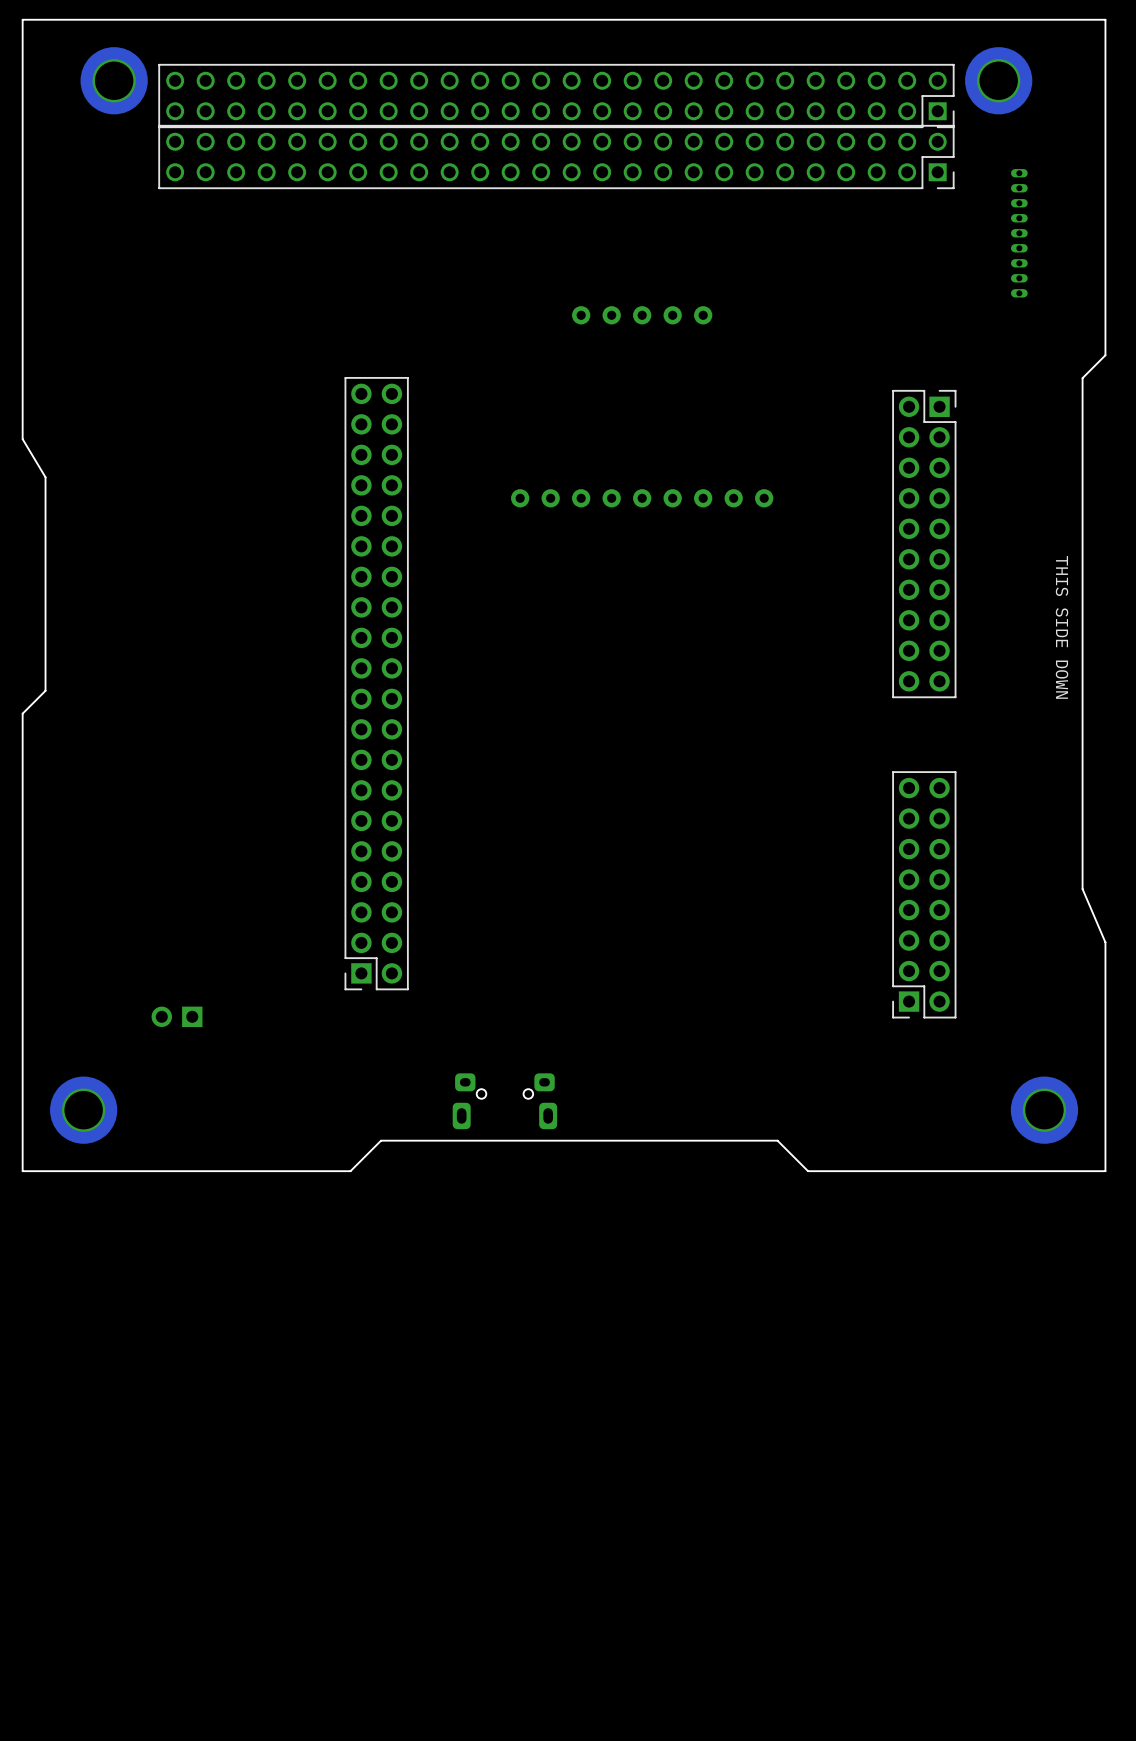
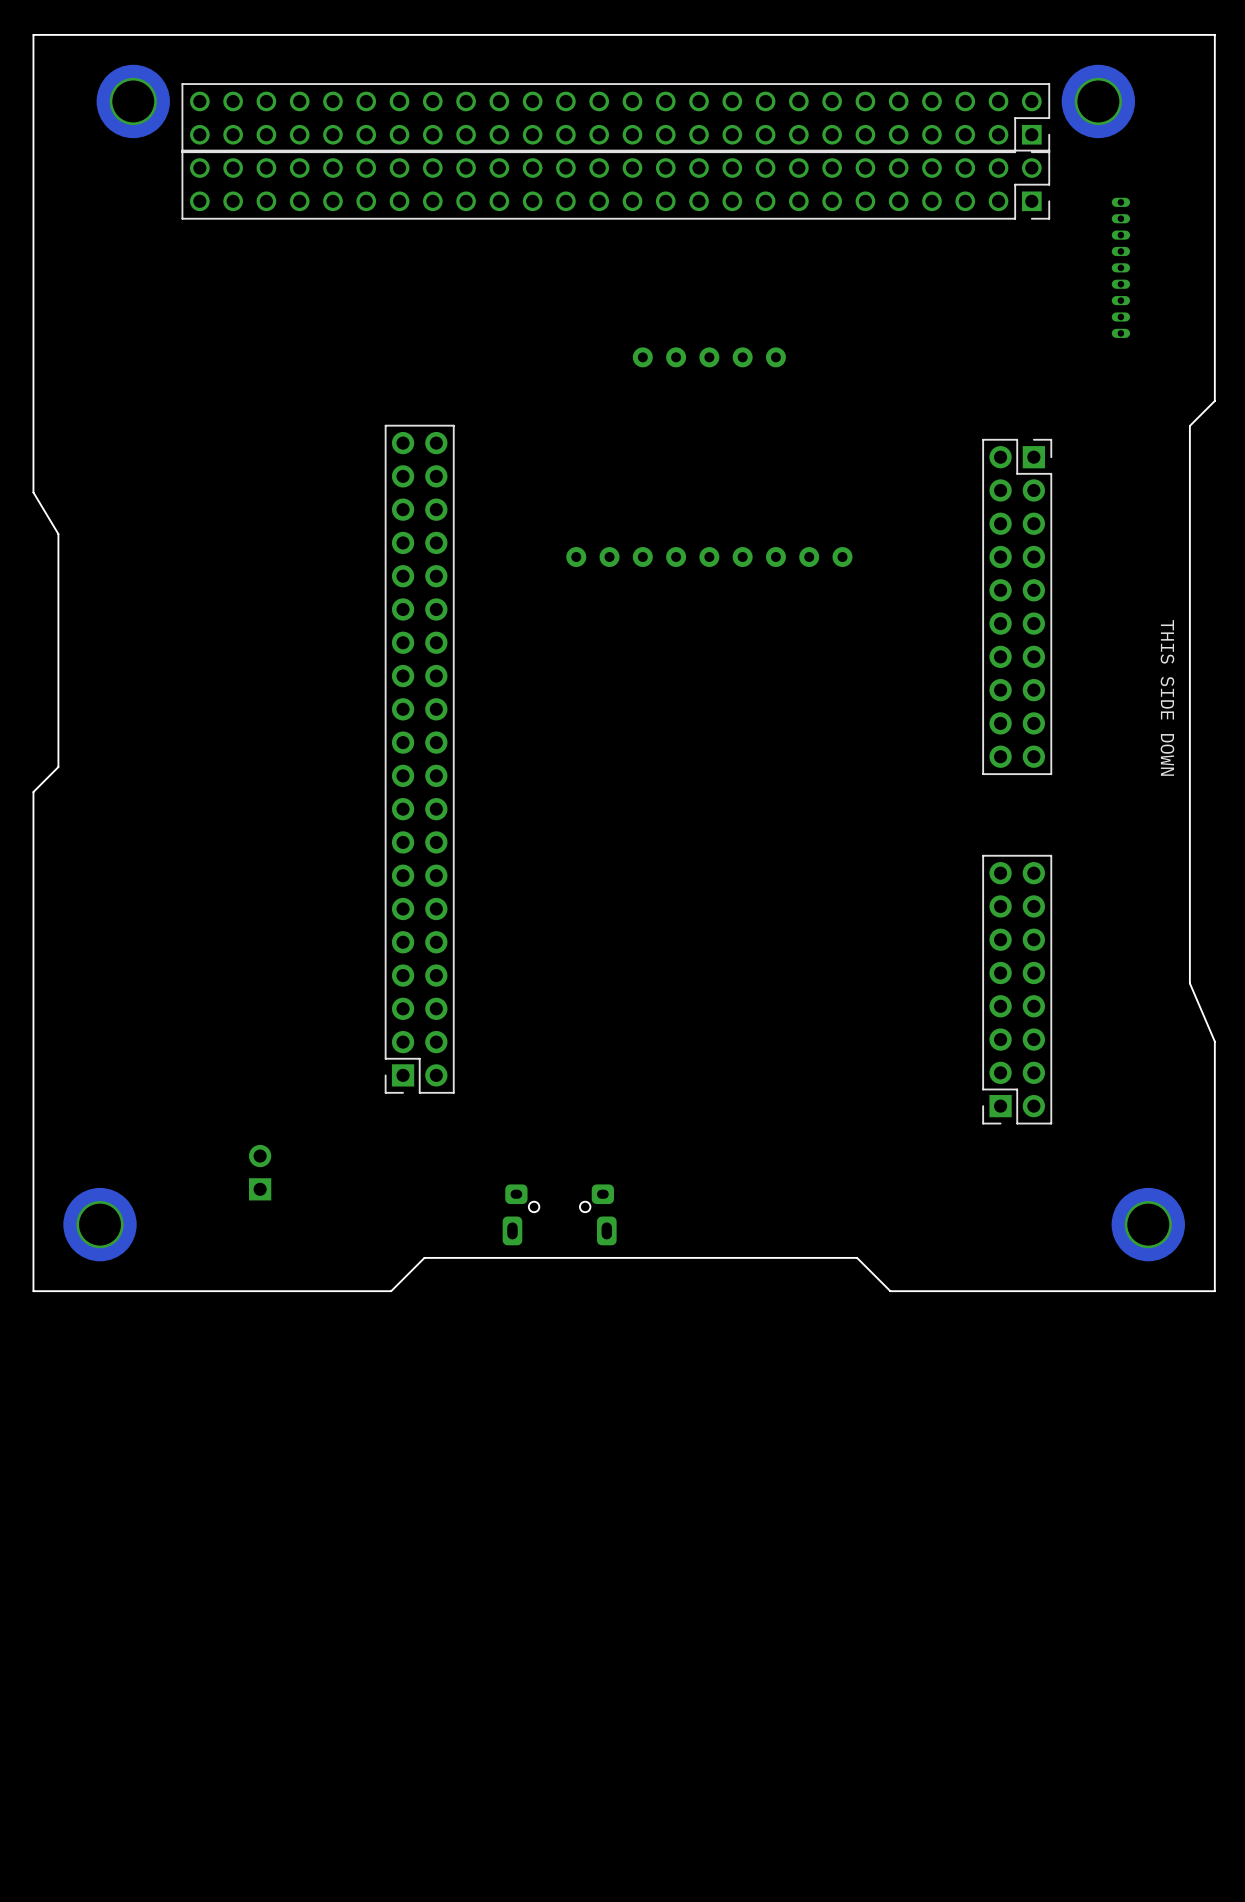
part rotation: 0° (177, 1016) -> 90° clockwise (260, 1172)
part position: (177, 1016) -> (260, 1172)

